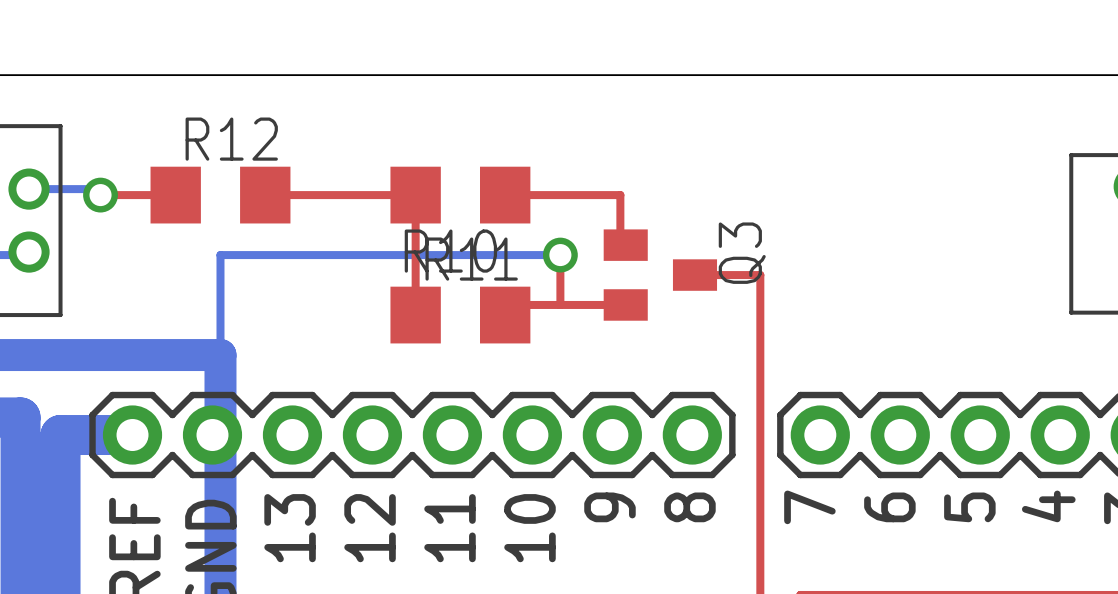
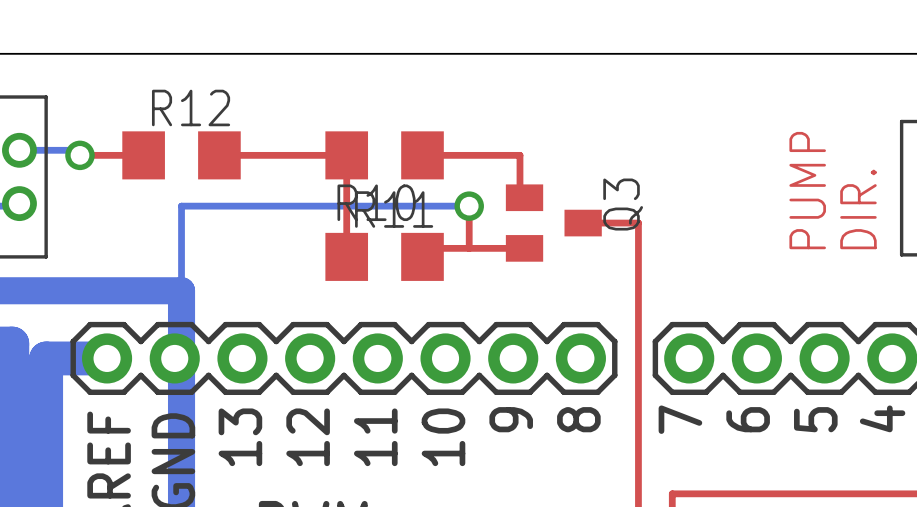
text: none -> PUMP (807, 190)
text: none -> DIR. (858, 209)

